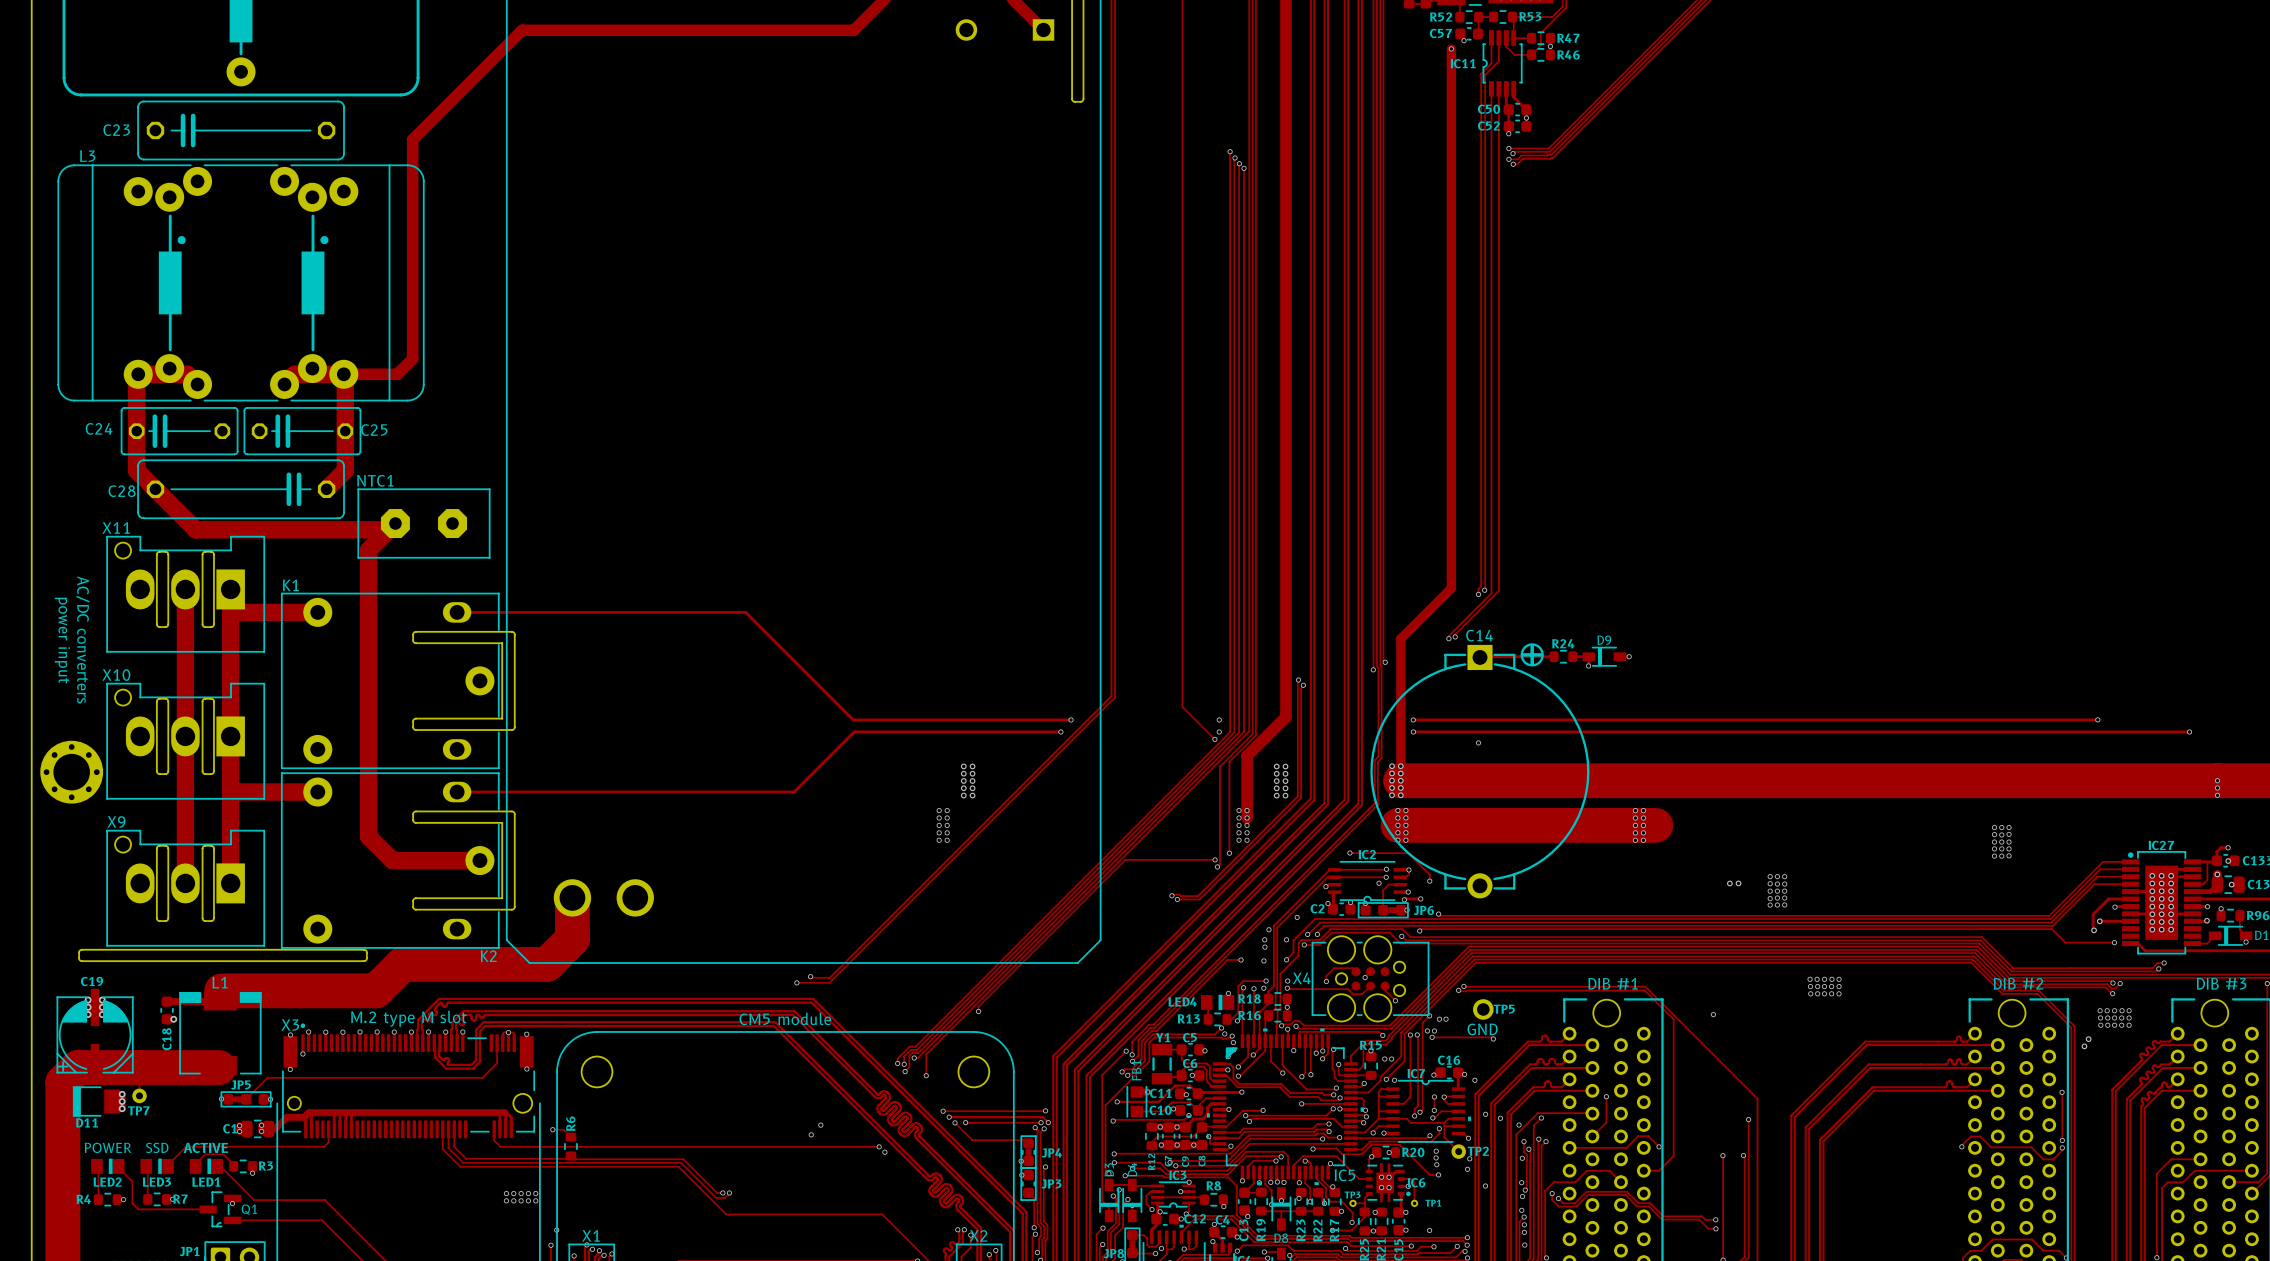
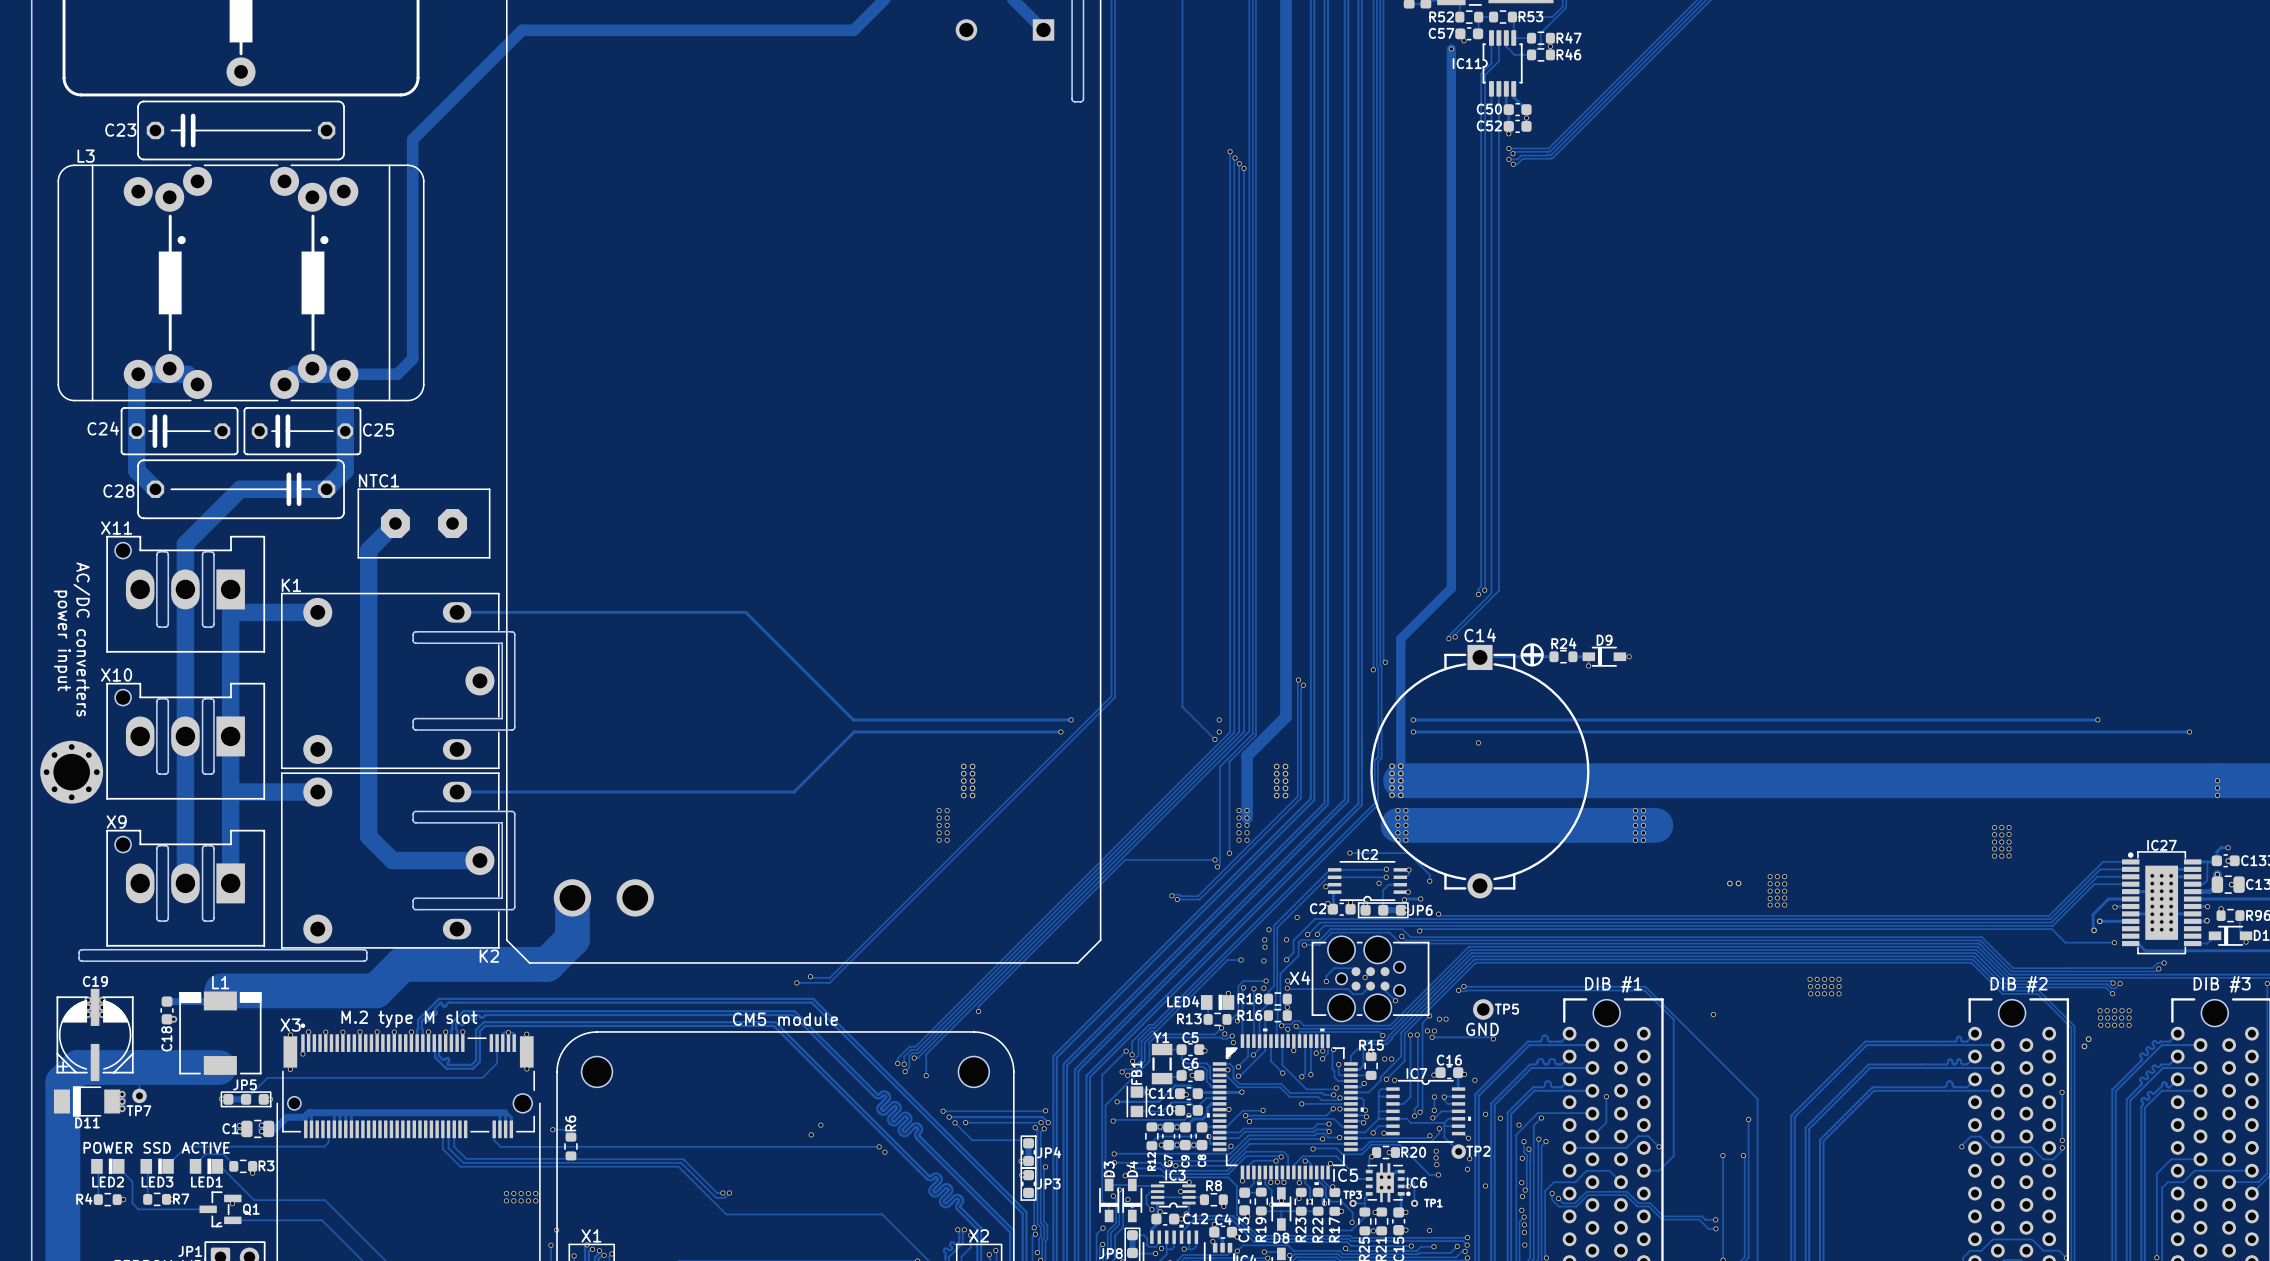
track: (155, 489) (196, 529) (389, 529) -> none
track: none -> (326, 489) (240, 489) (185, 544) (185, 589)

